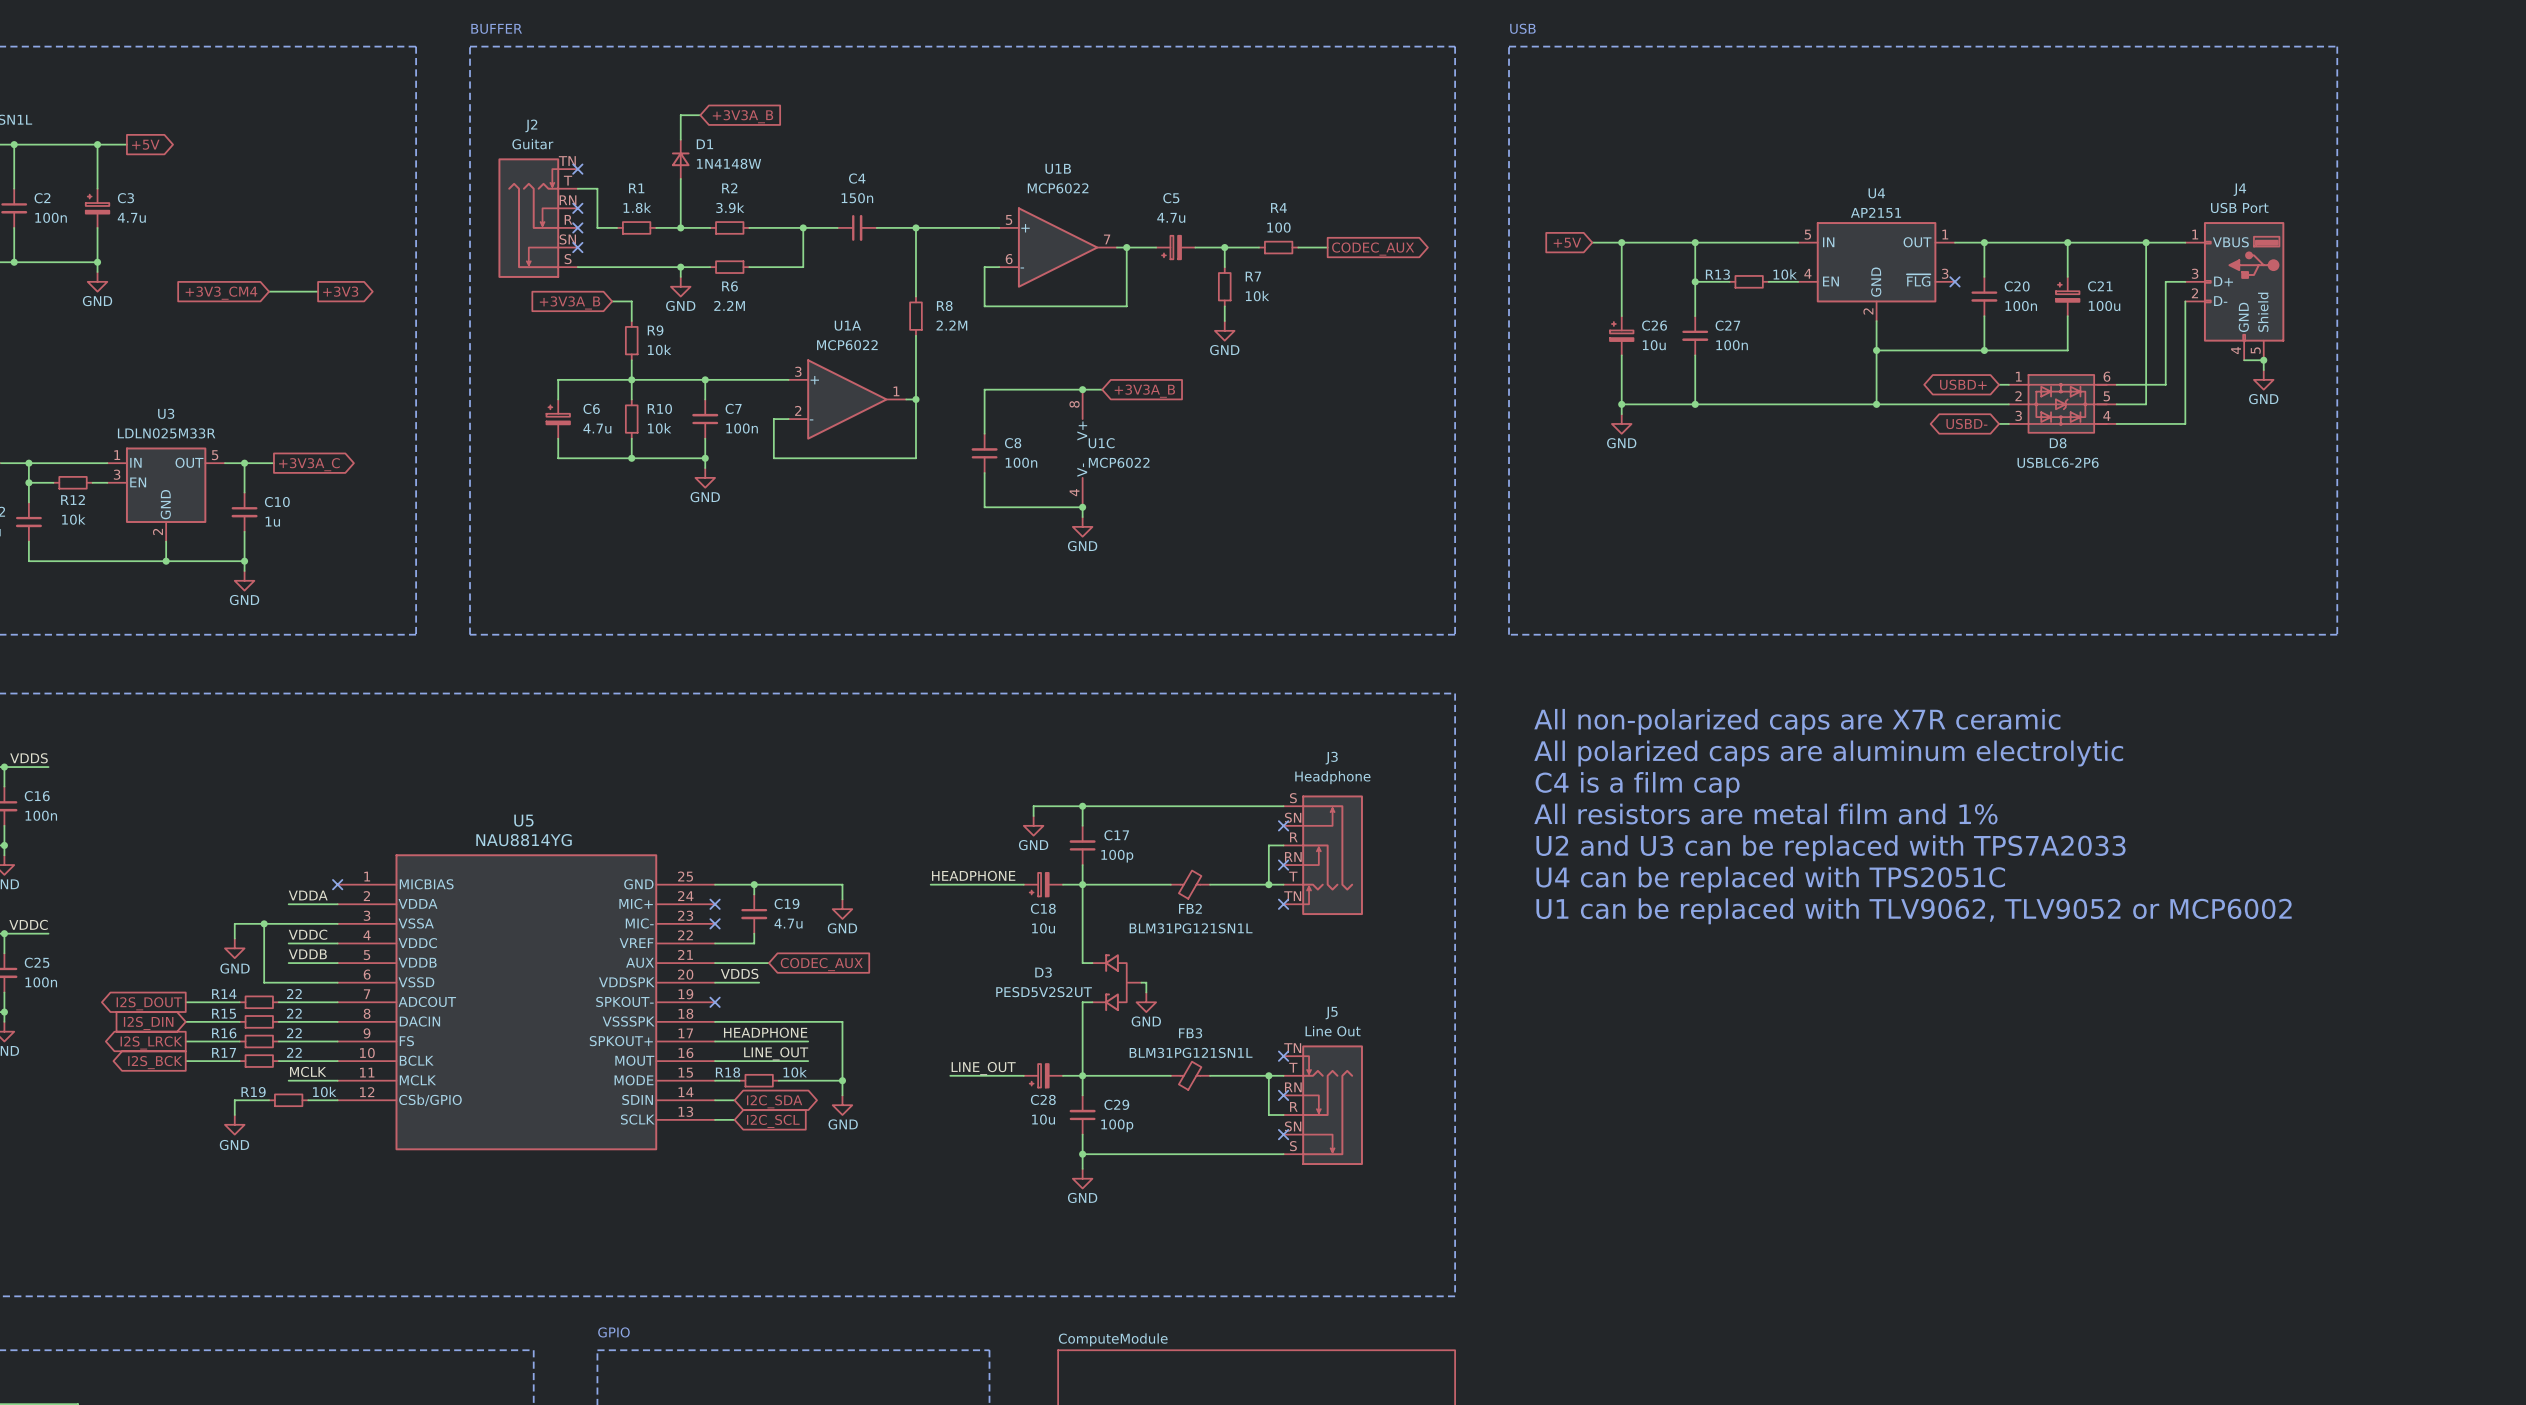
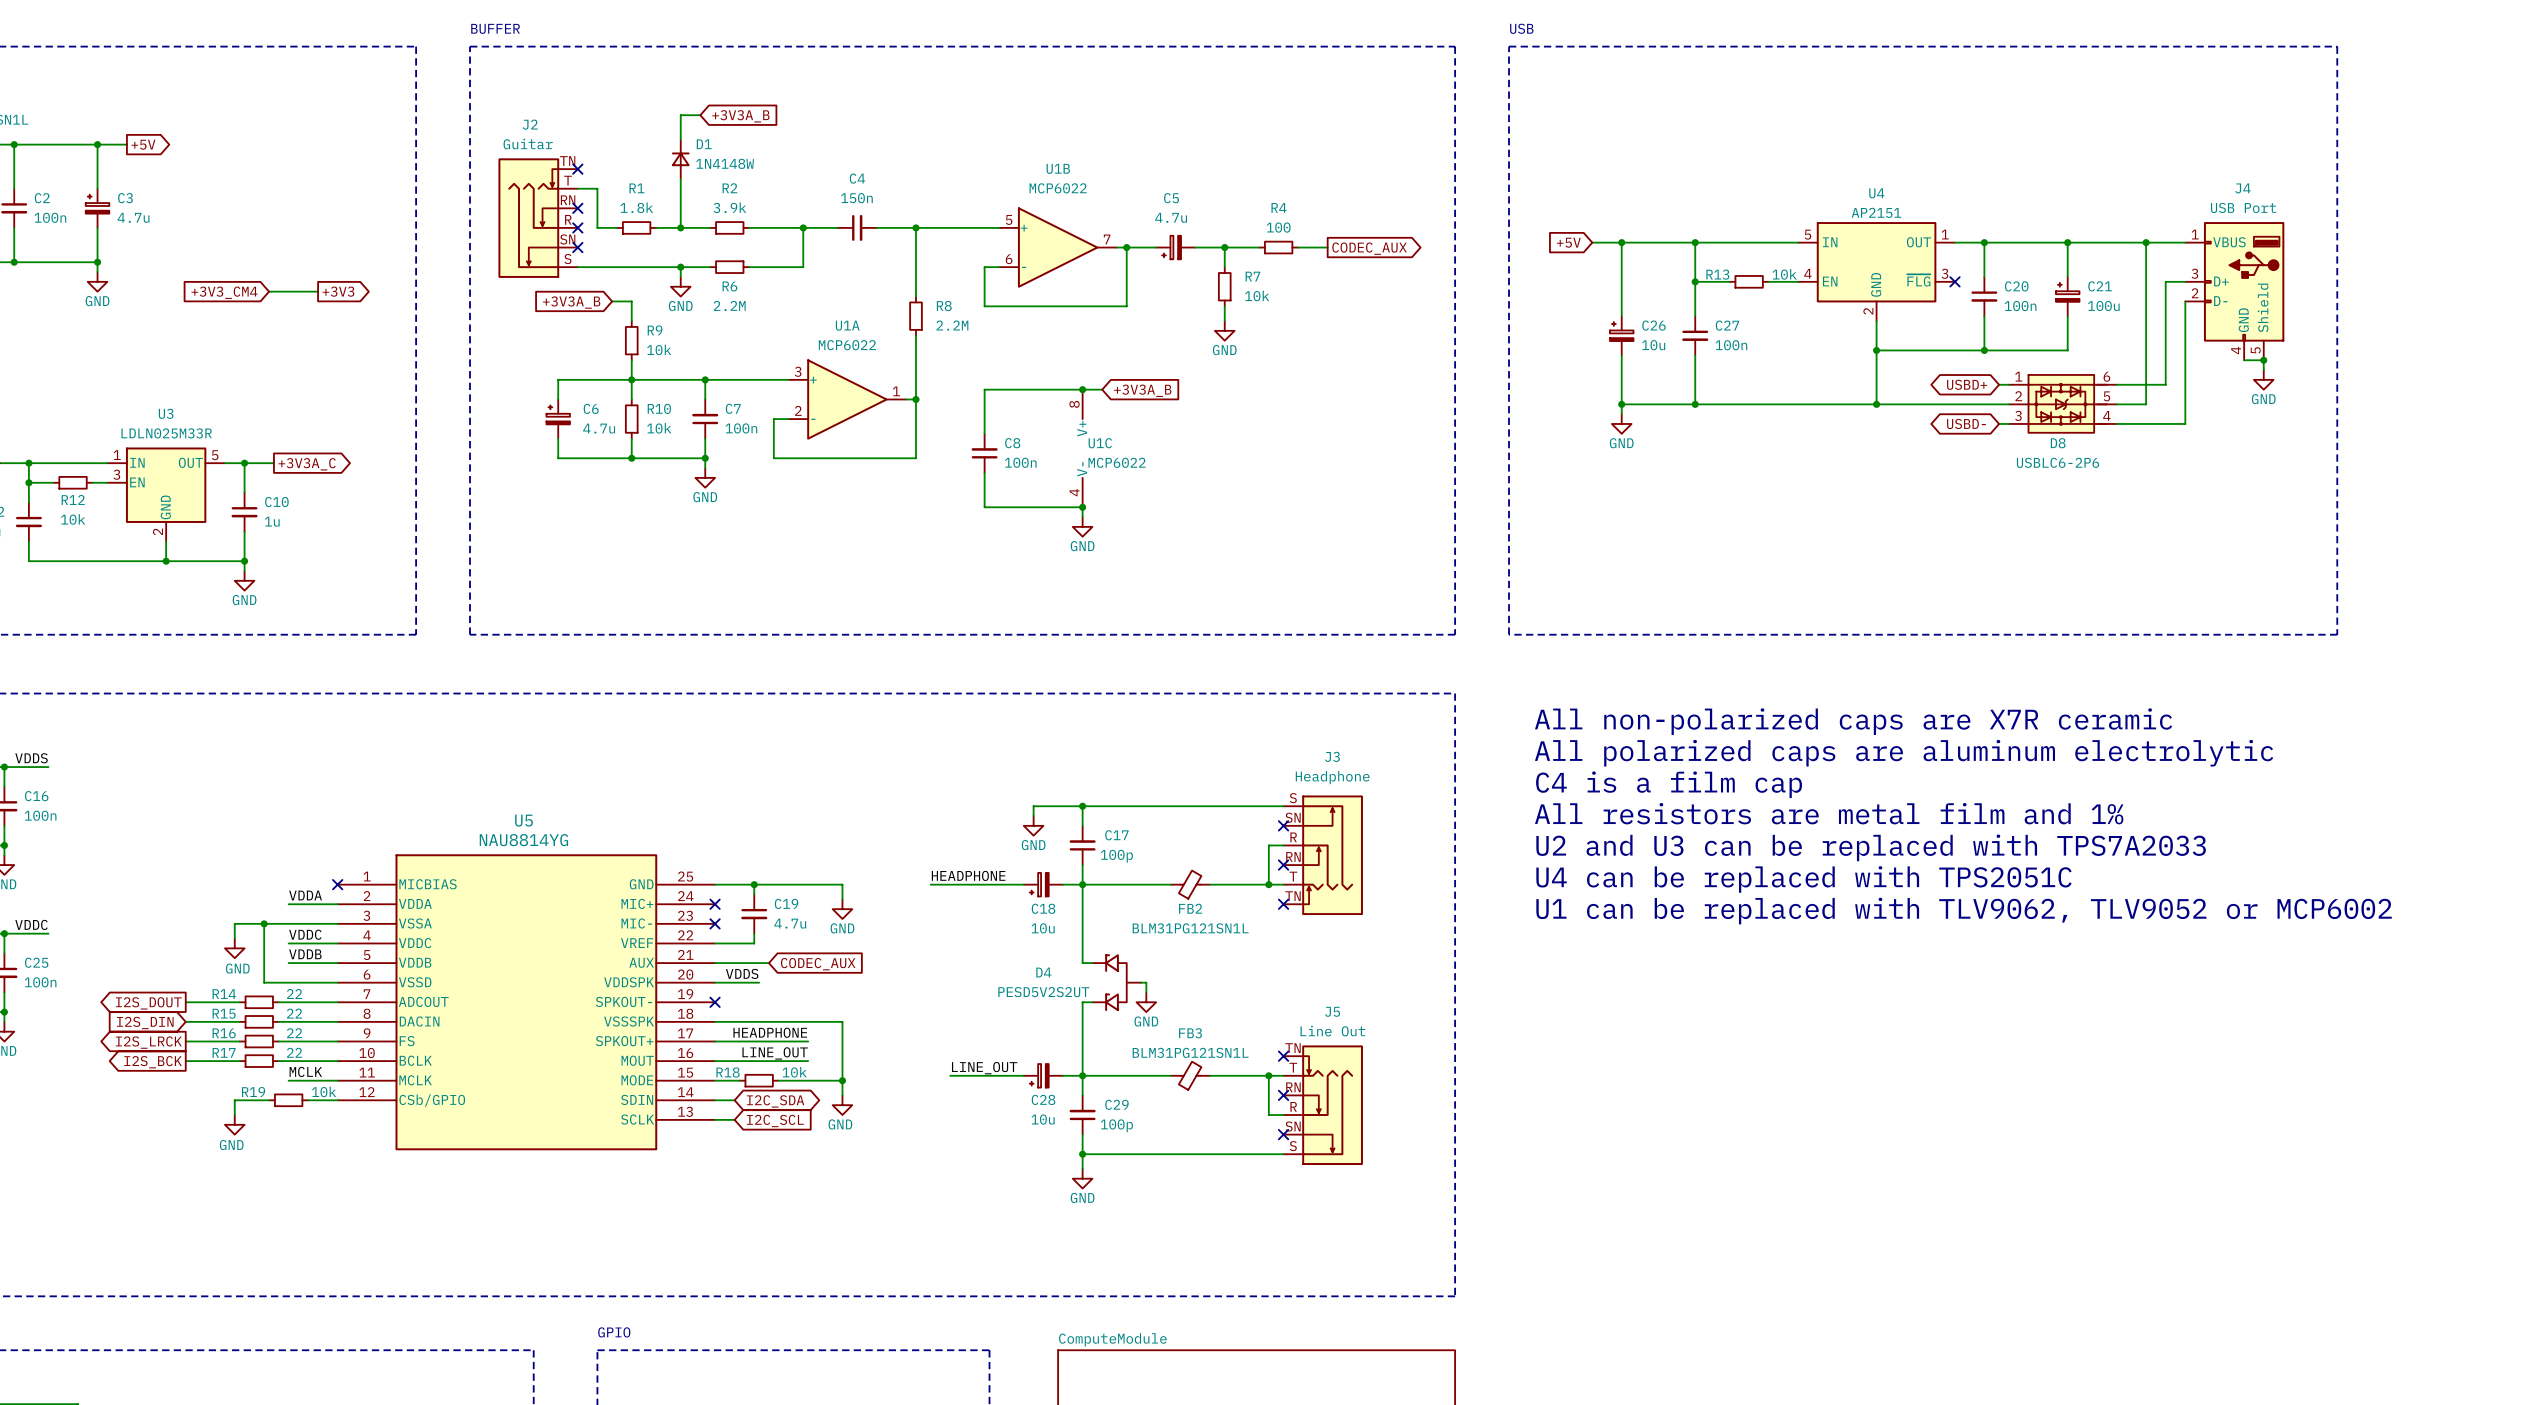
D3 name: D3 (1043, 972) -> D4 (1043, 972)

